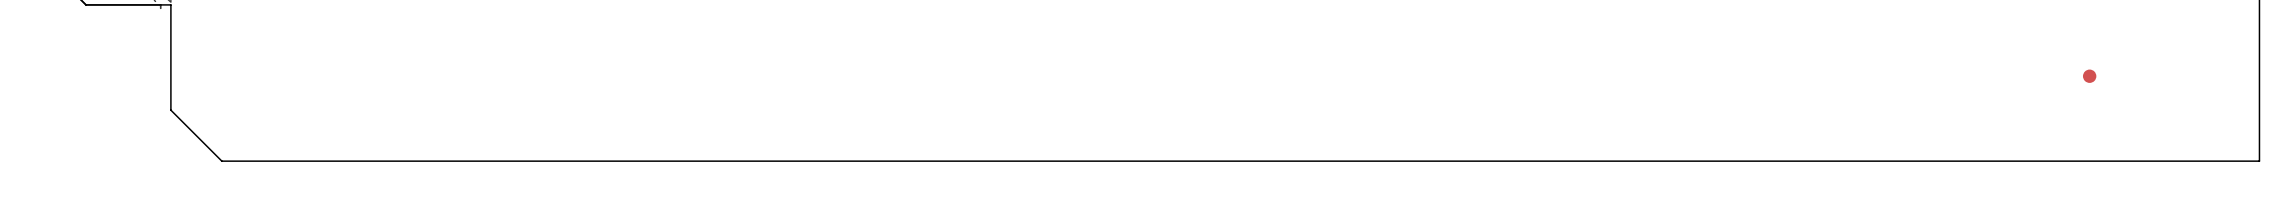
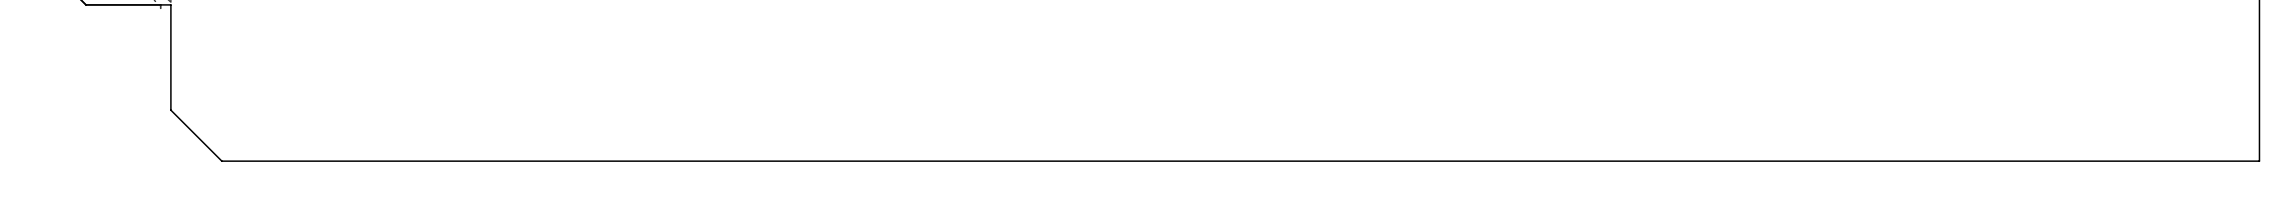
part: (2089, 76) -> none

